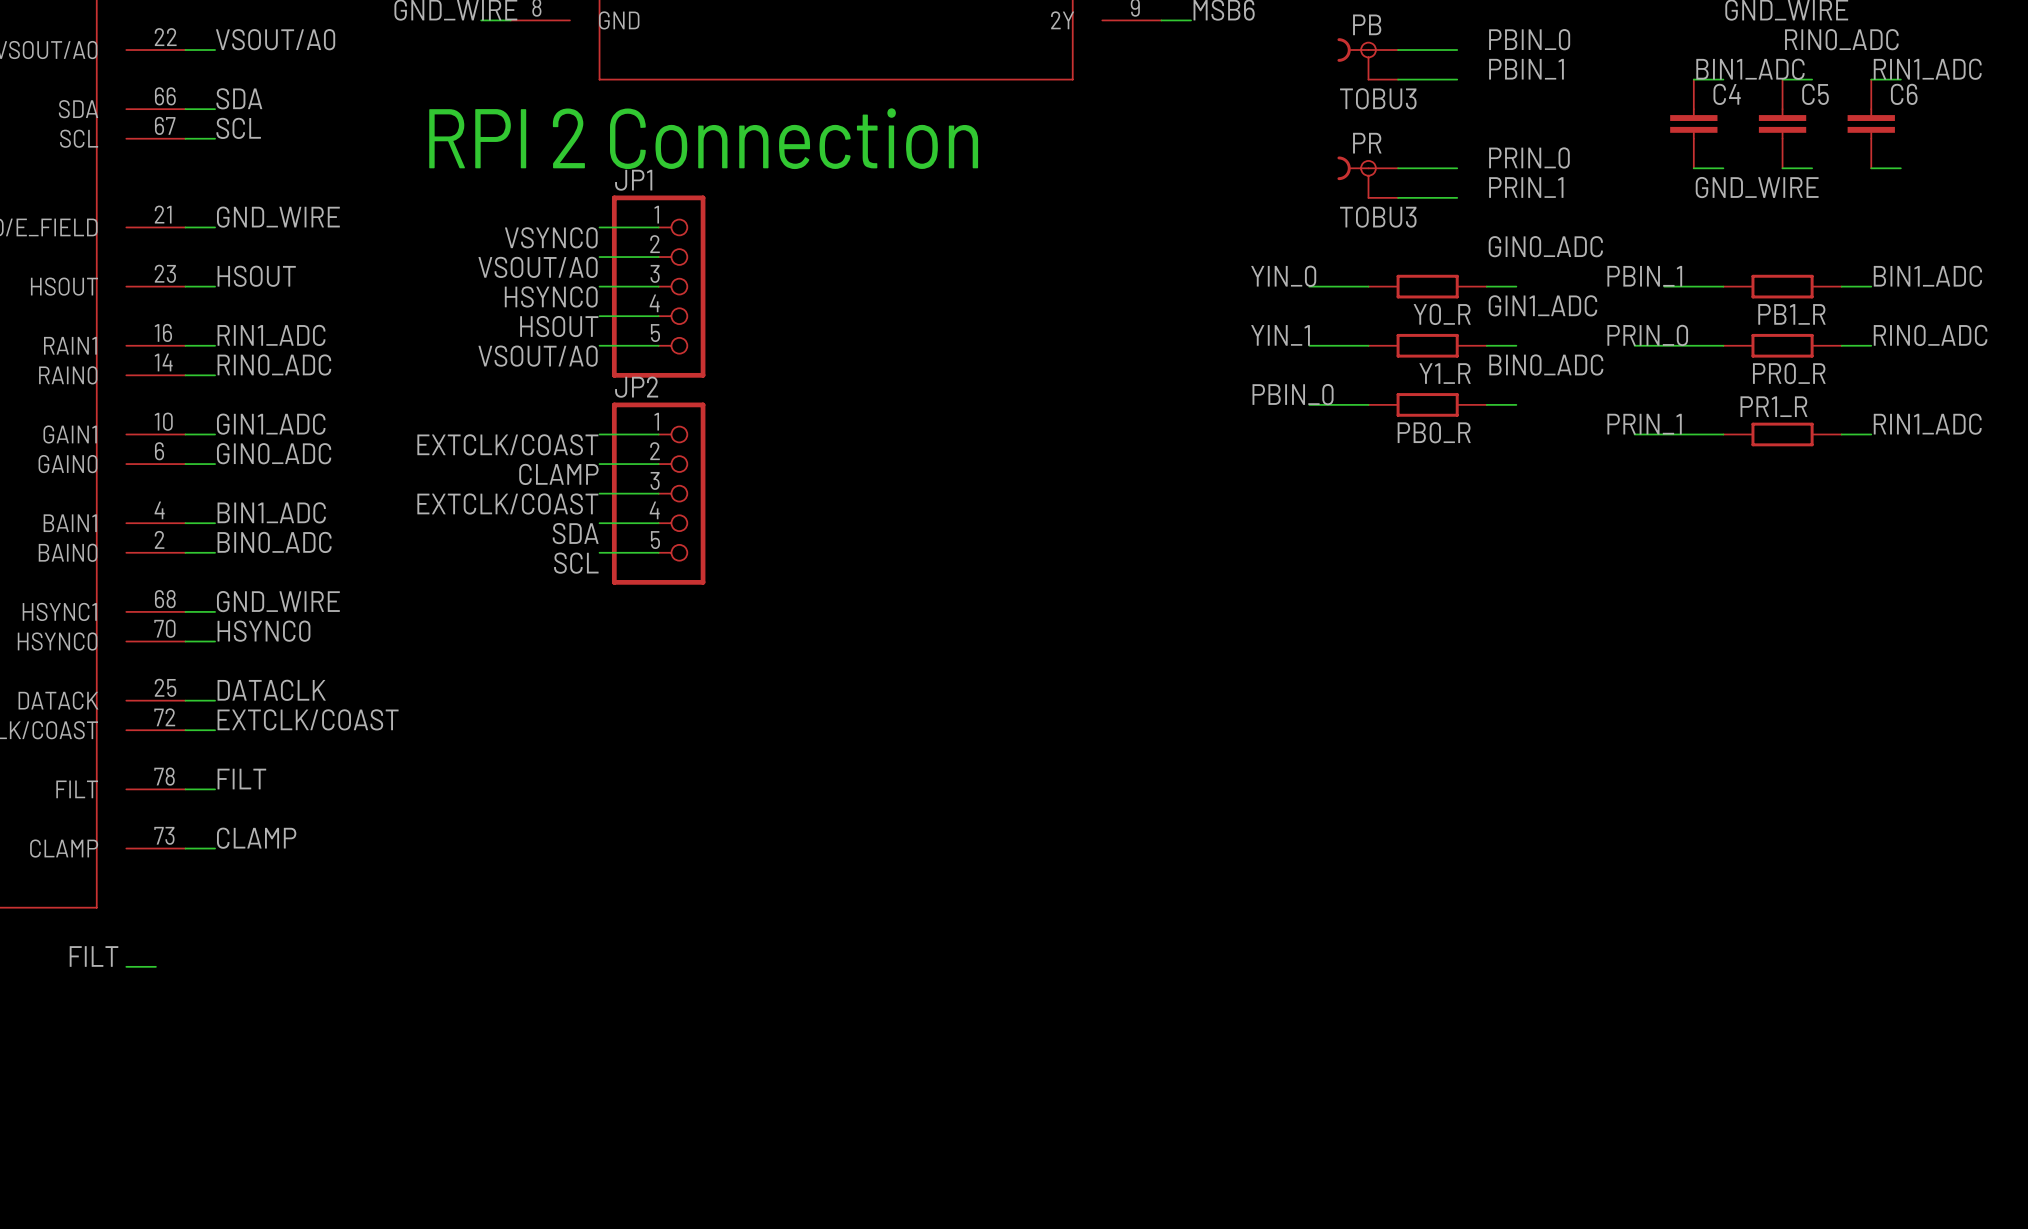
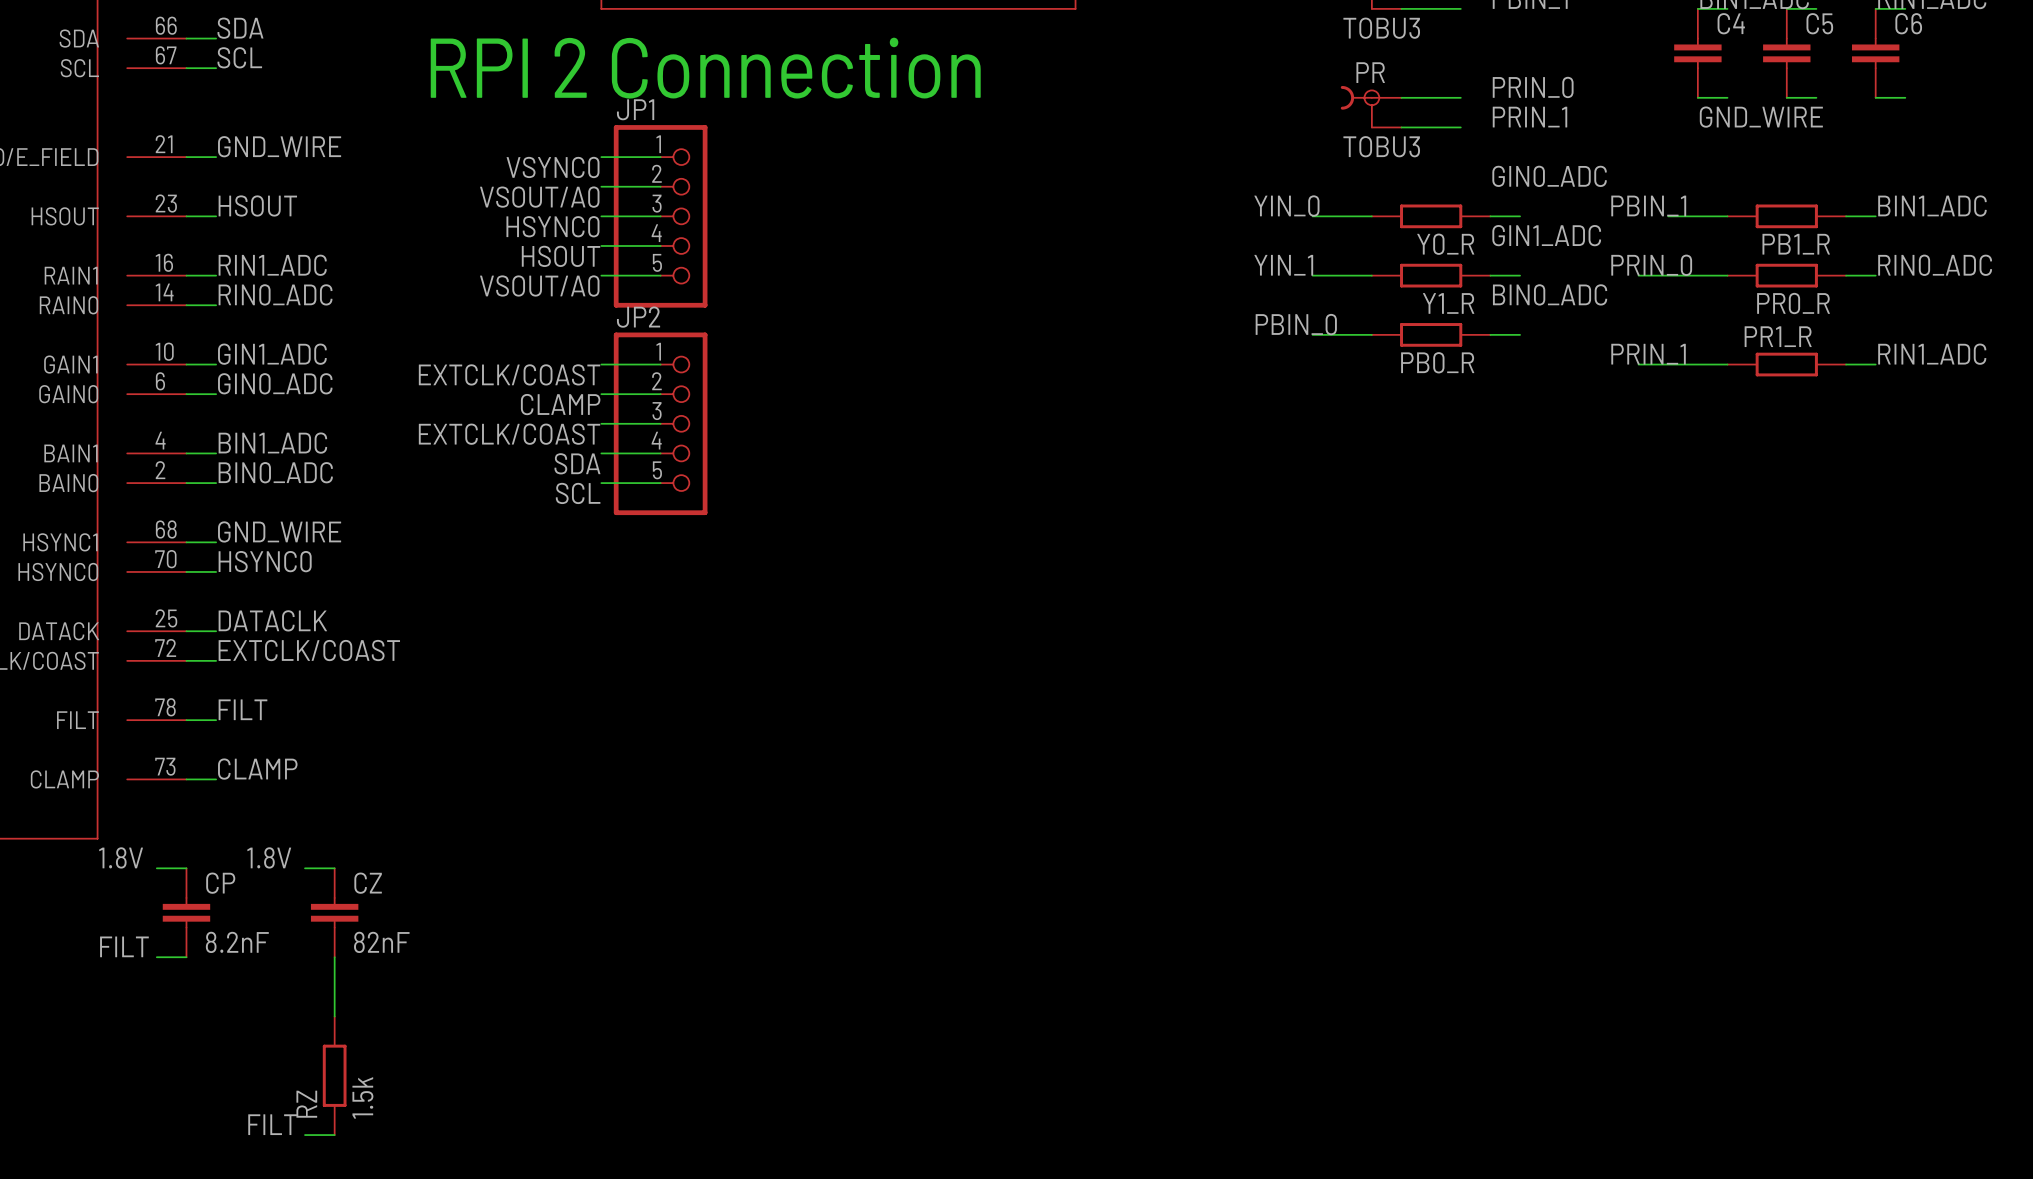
label: none -> 1.8V (121, 857)
label: none -> 1.8V (269, 857)
wire: none -> (305, 868) (334, 868)
label position: FILT (94, 956) -> FILT (124, 946)
wire: (126, 966) (155, 966) -> (156, 868) (186, 868)
CP: none -> 8.2nF (186, 912)
CZ: none -> 82nF (334, 912)
wire: none -> (156, 957) (186, 957)
wire: none -> (334, 957) (334, 1016)
RZ: none -> 1.5k (334, 1075)
label: none -> FILT (272, 1124)
wire: none -> (305, 1135) (334, 1135)

